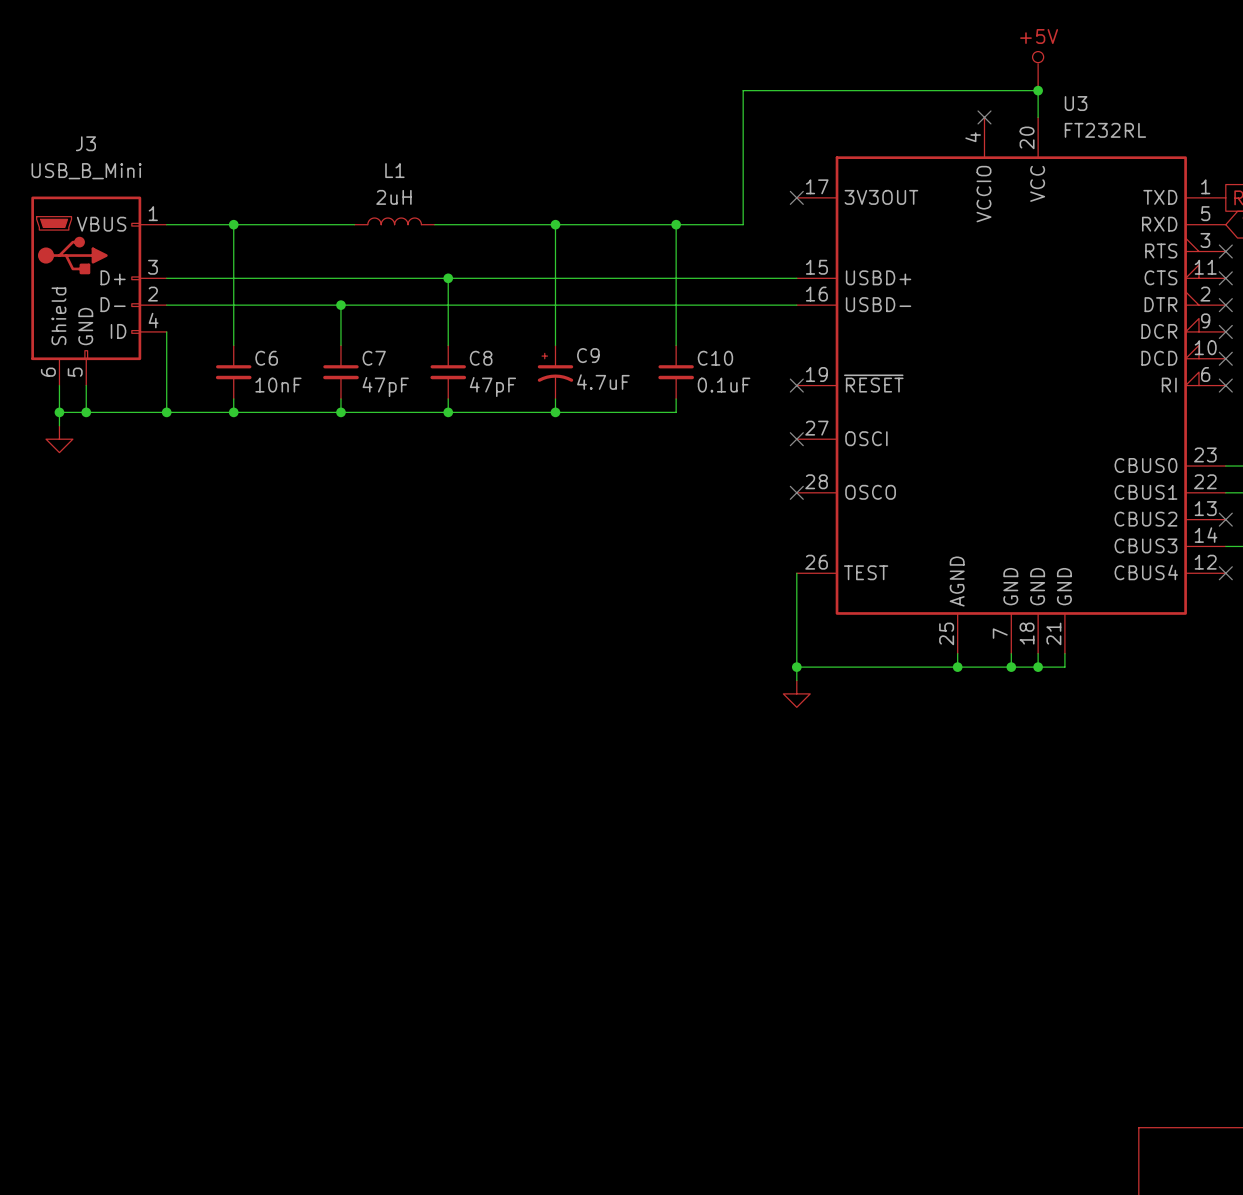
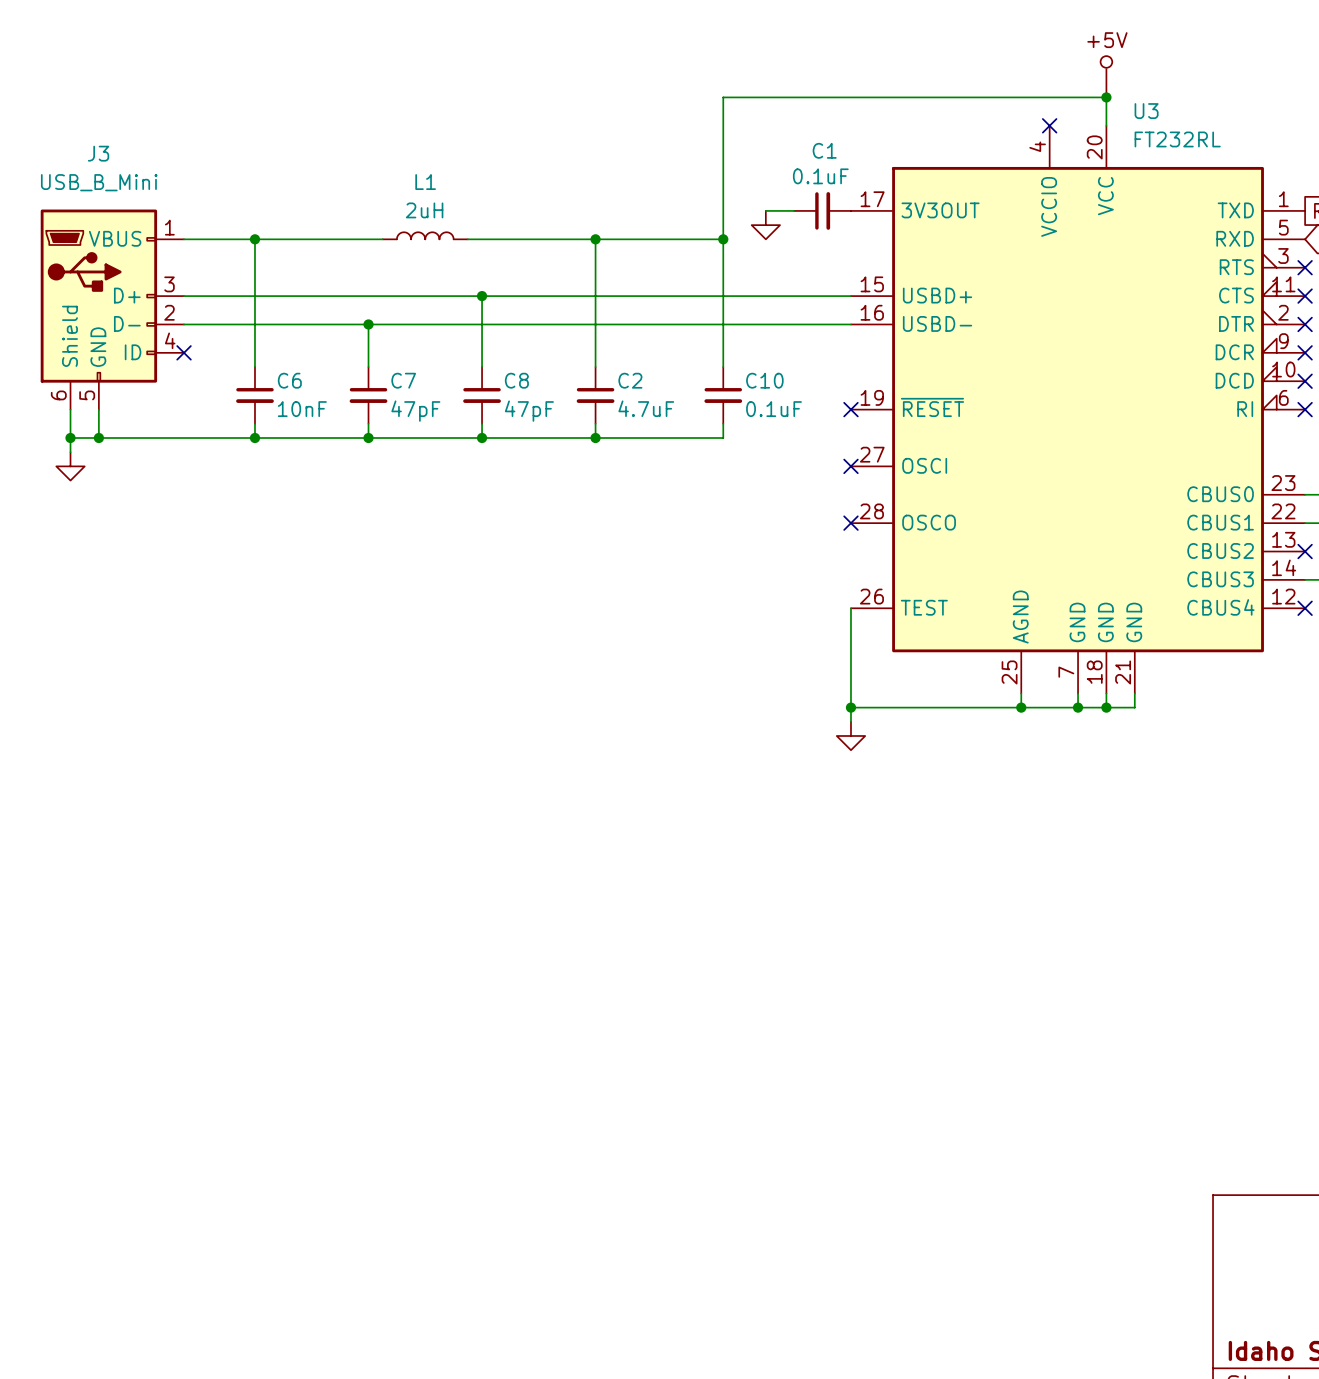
wire: (743, 90) (743, 224) (676, 224) -> (794, 97) (723, 97) (723, 239)
wire: none -> (765, 210) (794, 210)
C1: none -> 0.1uF (822, 210)
no-connect mark: (796, 197) -> none
power symbol: none -> (765, 225)
wire: (166, 331) (166, 412) -> none
no-connect mark: none -> (184, 352)
C9: 4.7uF (555, 372) -> none
C2: none -> 4.7uF (595, 395)
junction: (166, 412) -> none

